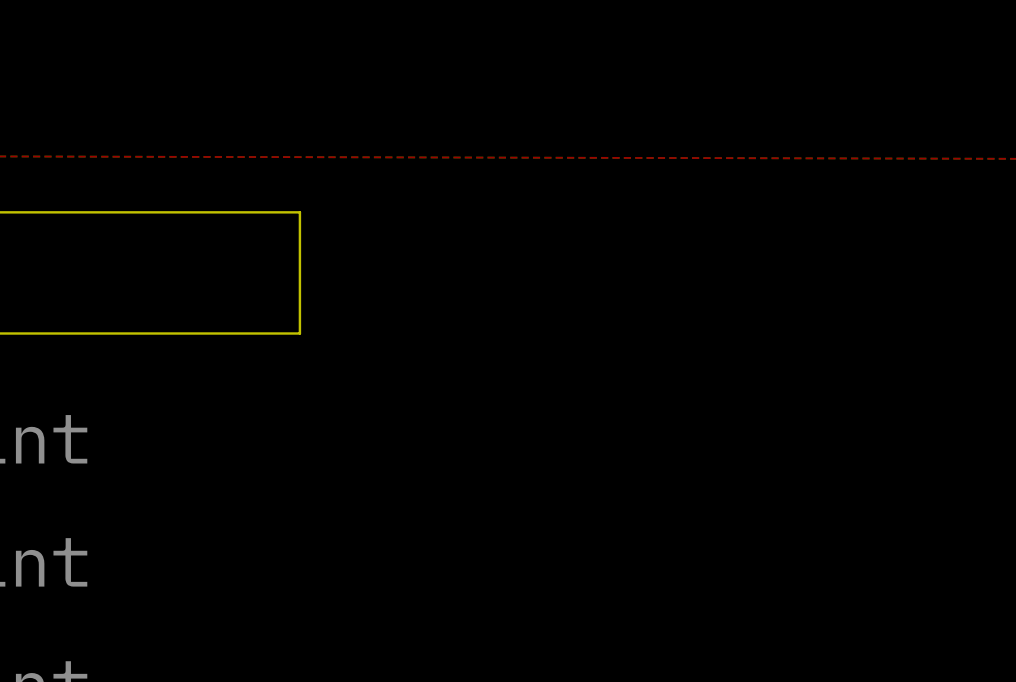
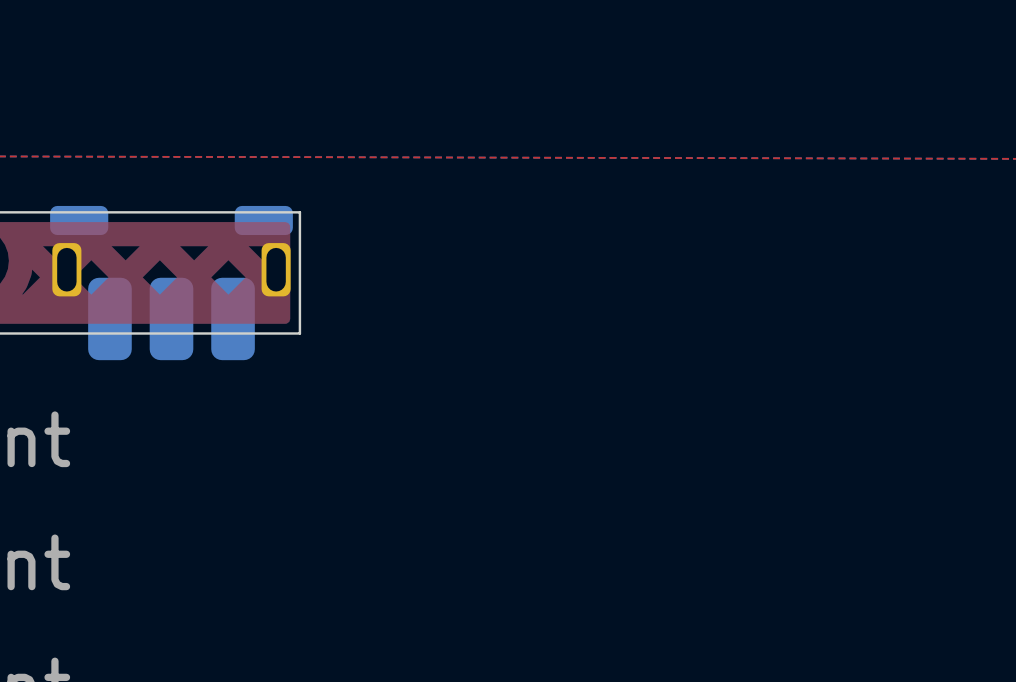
part: none -> (171, 283)

